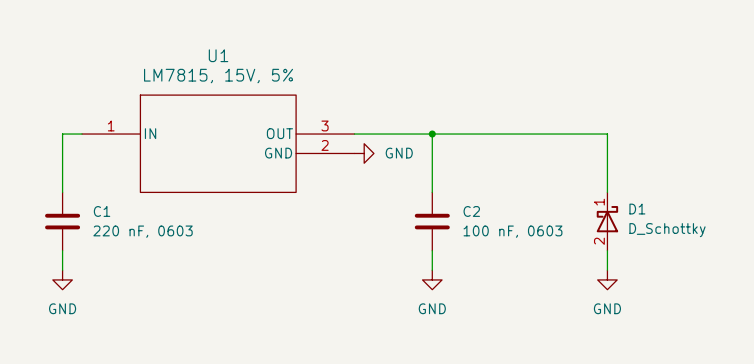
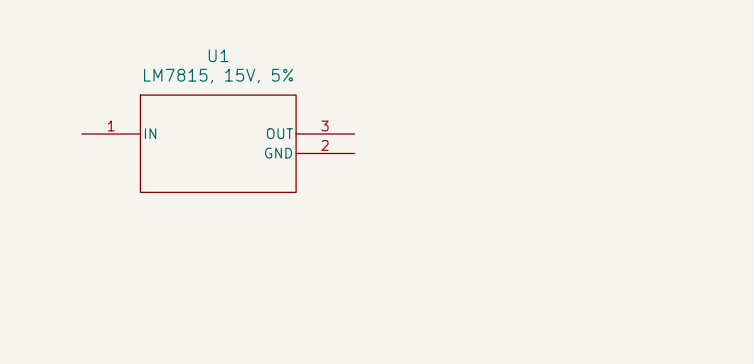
wire: (82, 134) (62, 134) (62, 192) -> none
wire: (354, 134) (607, 134) (607, 192) -> none
wire: (432, 134) (432, 192) -> none
junction: (432, 134) -> none
power symbol: GND (364, 153) -> none
C1: 220 nF, 0603 (62, 221) -> none
C2: 100 nF, 0603 (432, 221) -> none
D1: D_Schottky (607, 221) -> none
wire: (62, 250) (62, 270) -> none
wire: (432, 250) (432, 270) -> none
wire: (607, 250) (607, 270) -> none
power symbol: GND (62, 279) -> none
power symbol: GND (432, 279) -> none
power symbol: GND (607, 279) -> none

